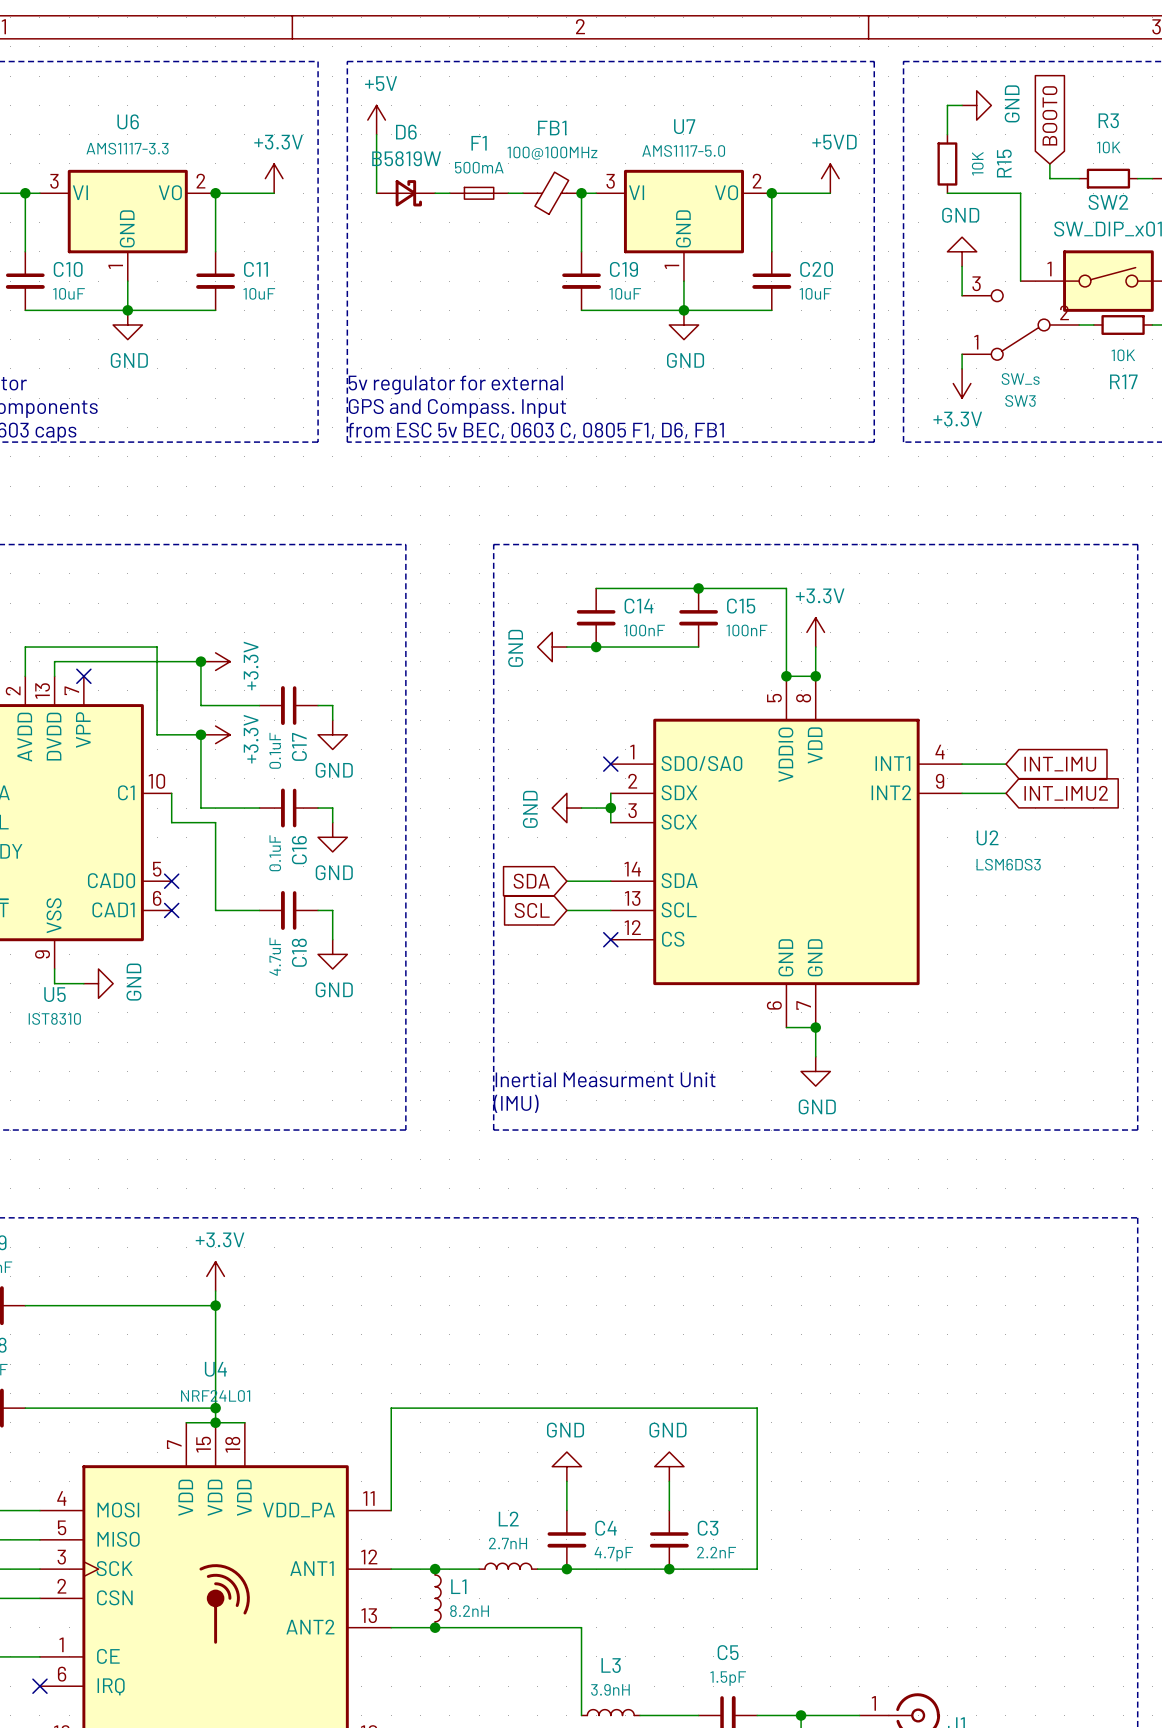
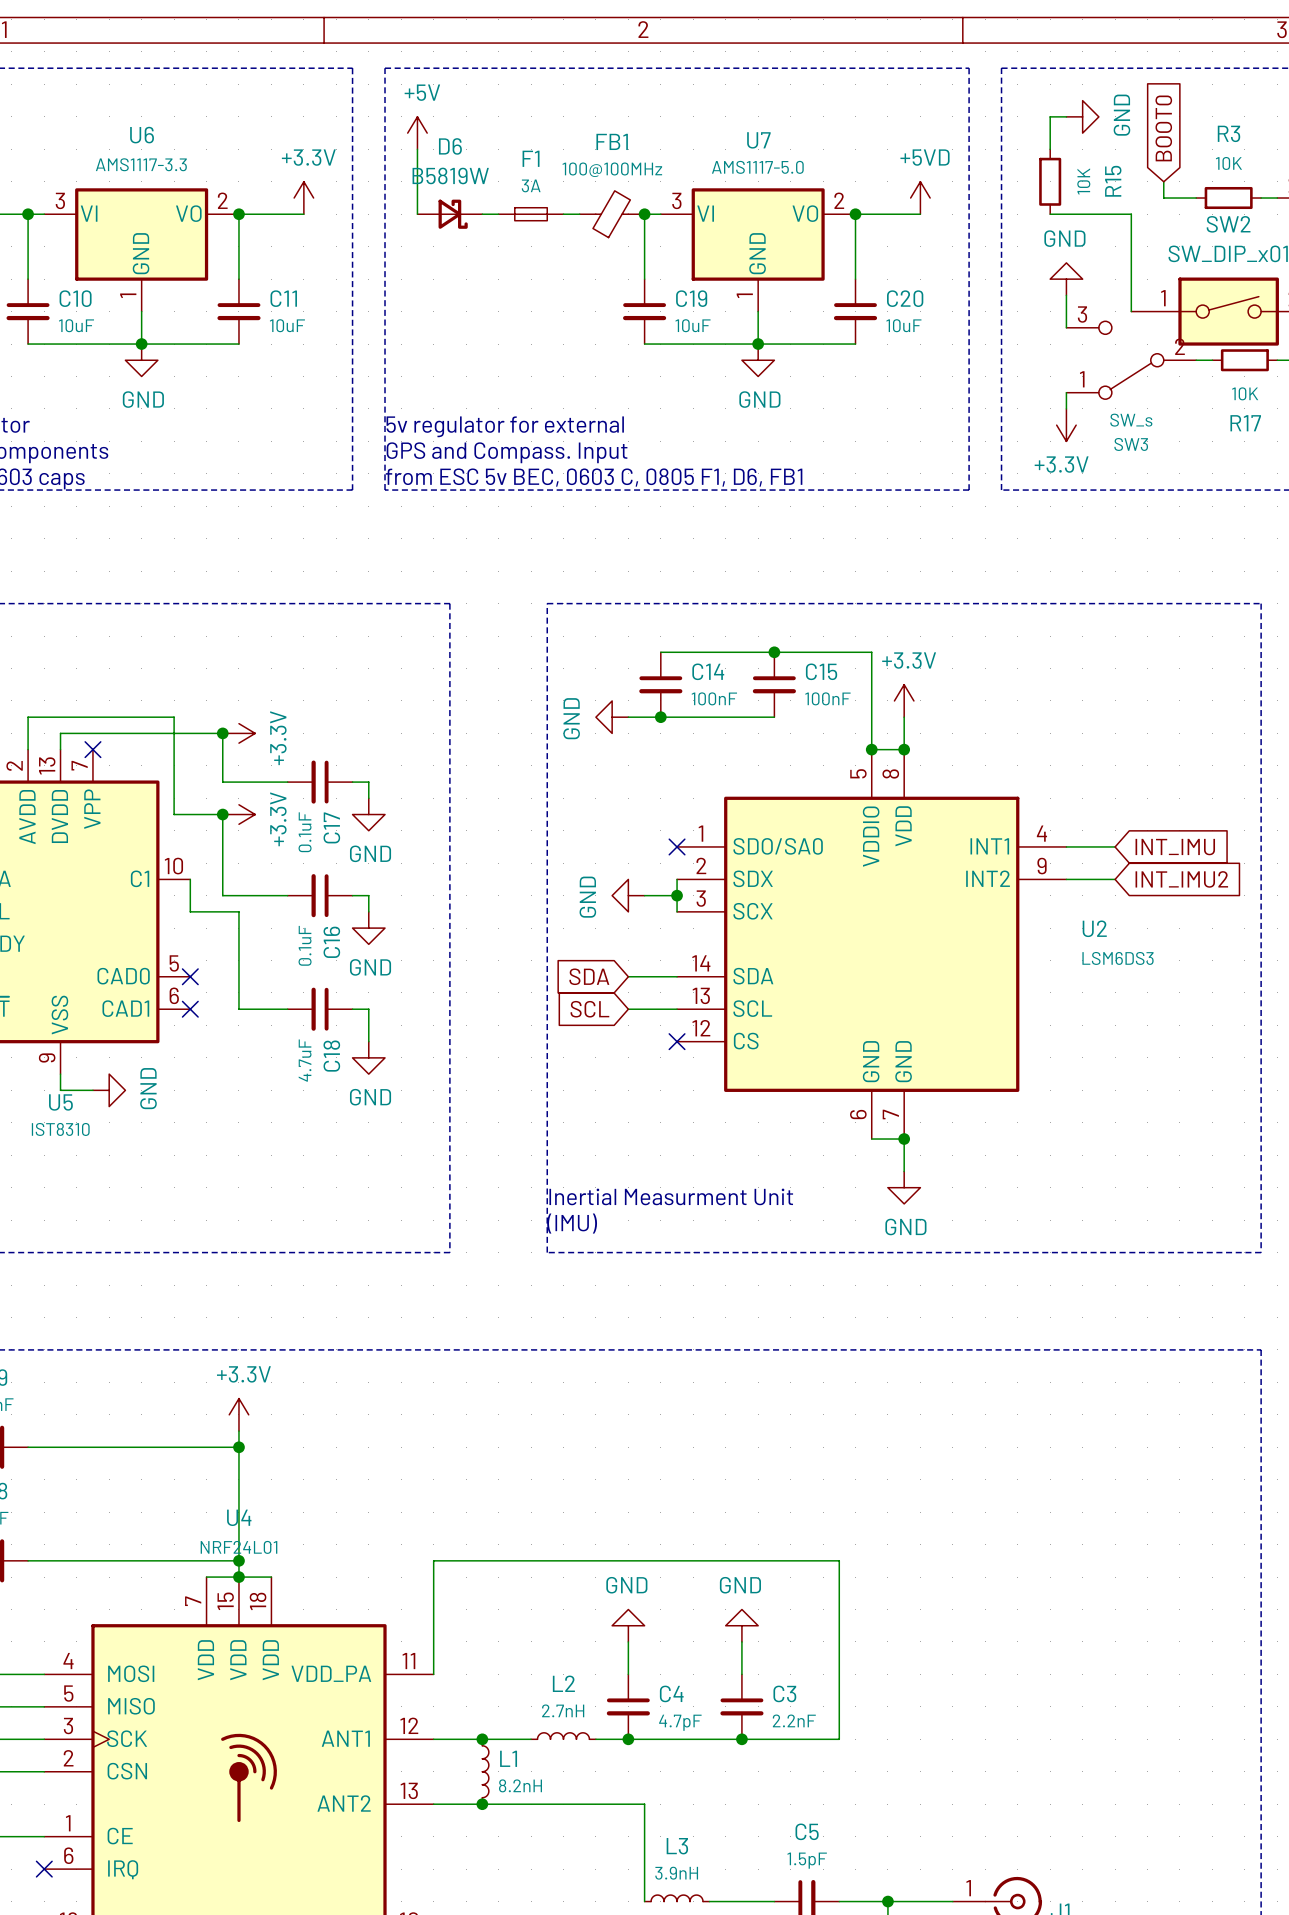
F1 value: 500mA (479, 167) -> 3A (531, 185)

